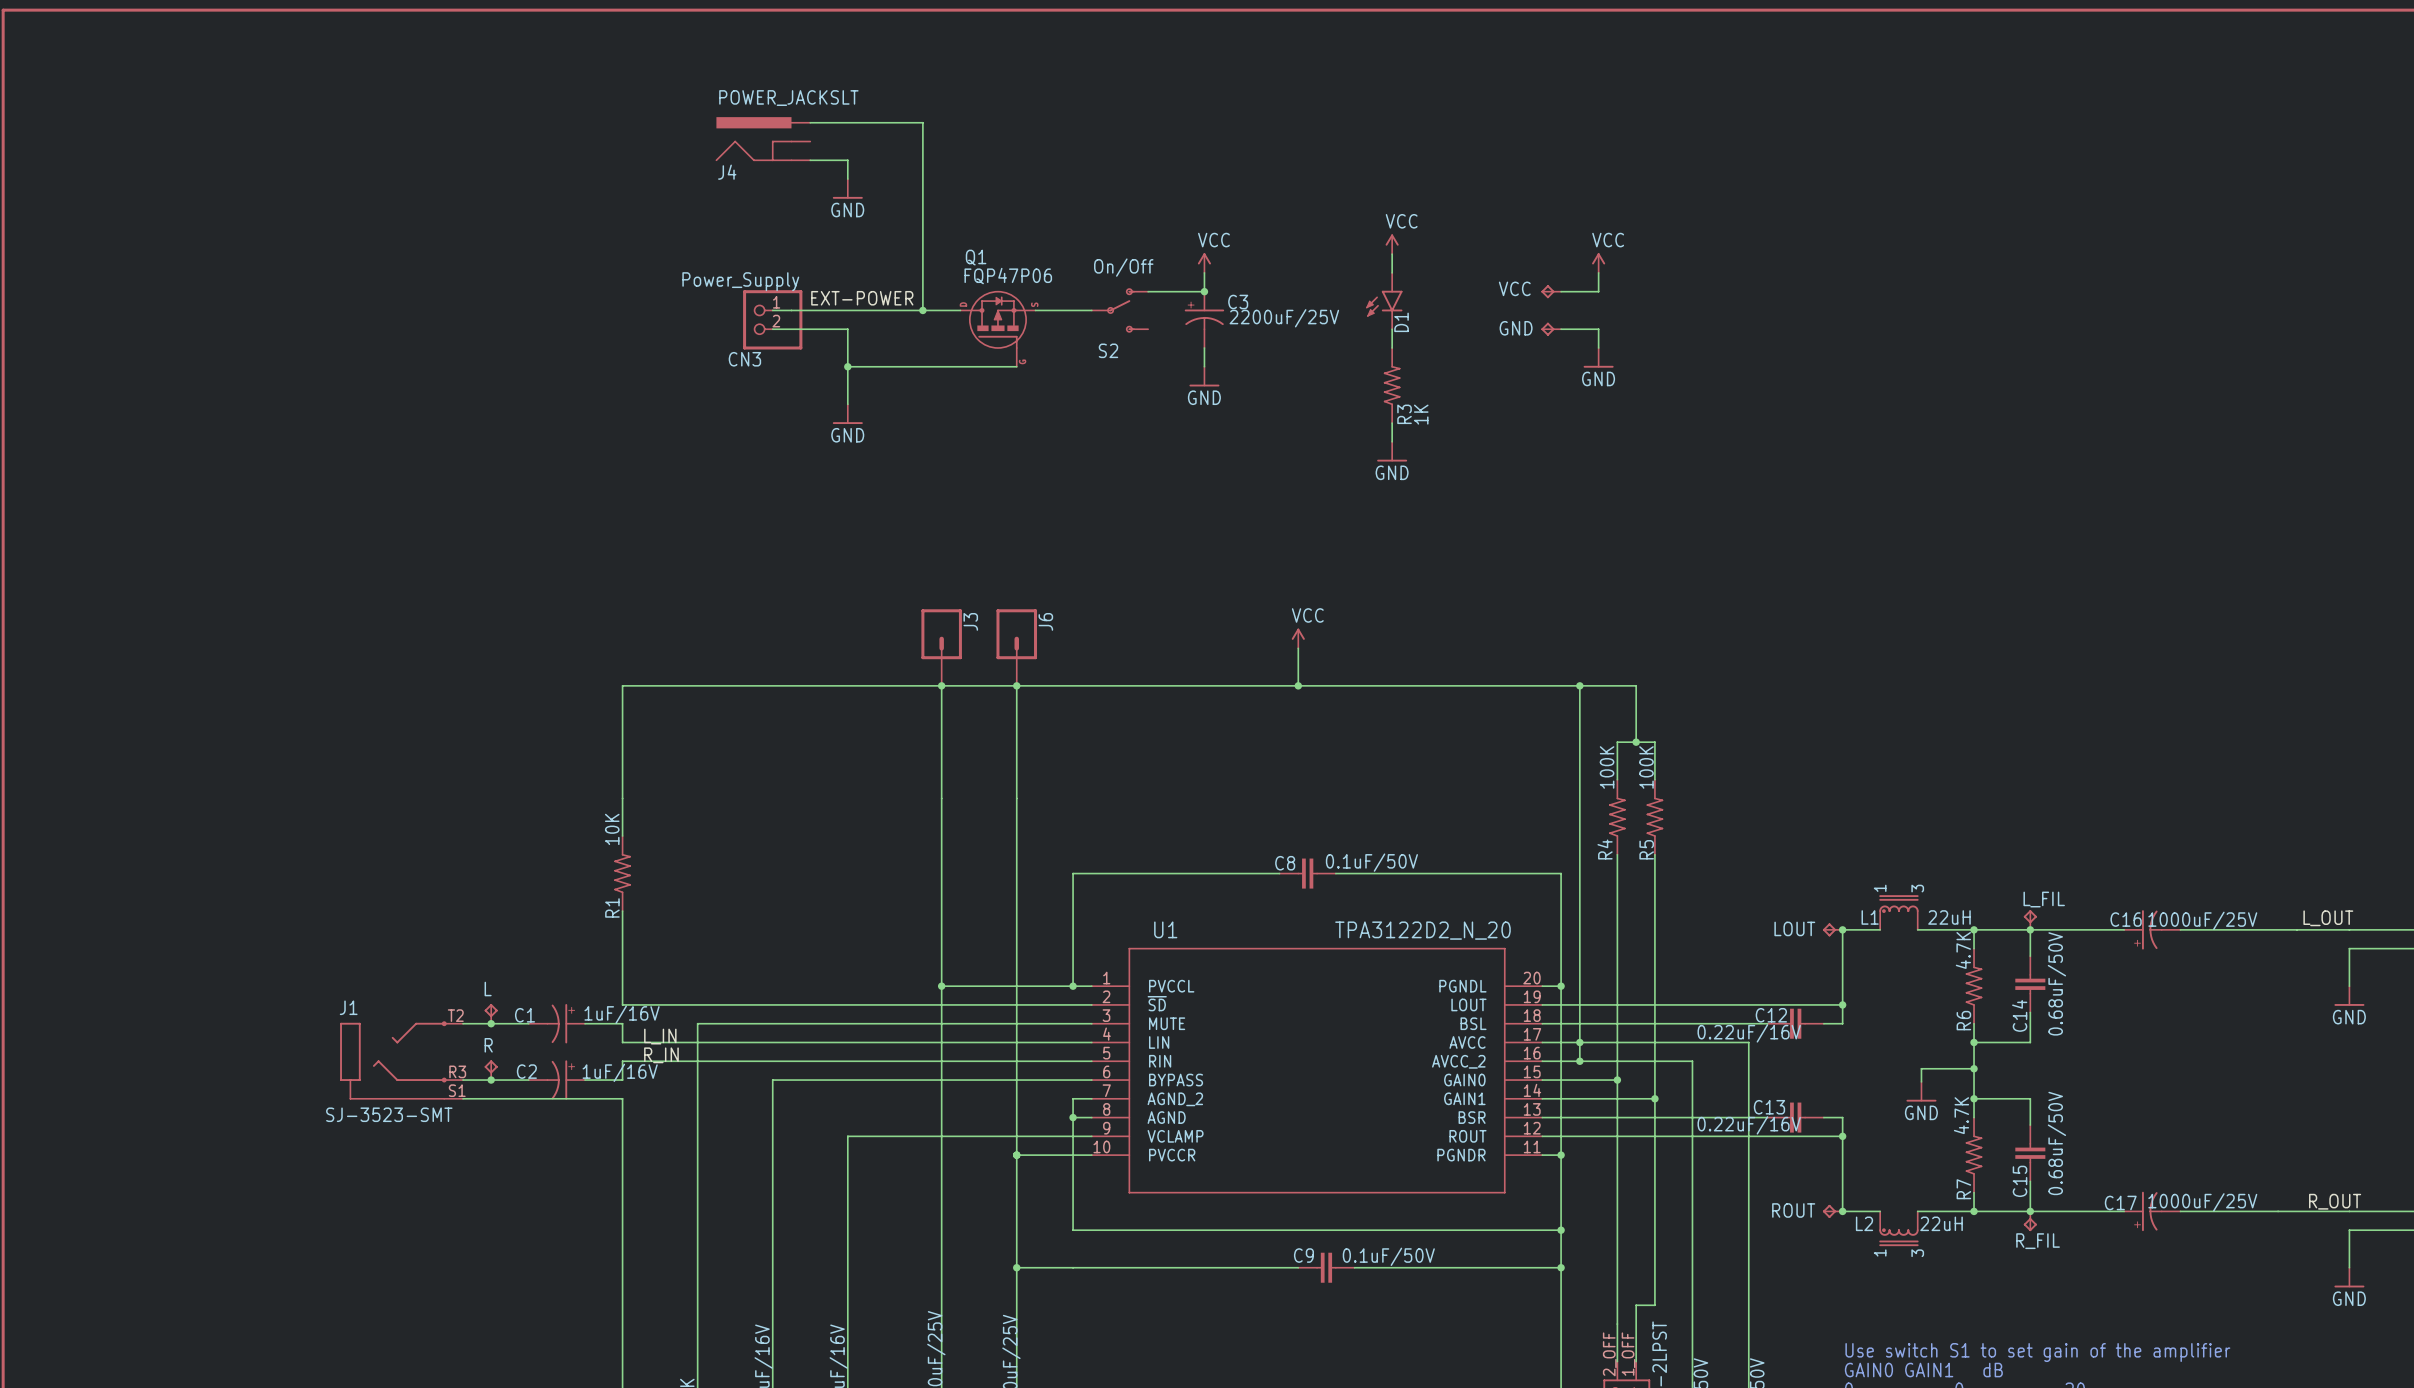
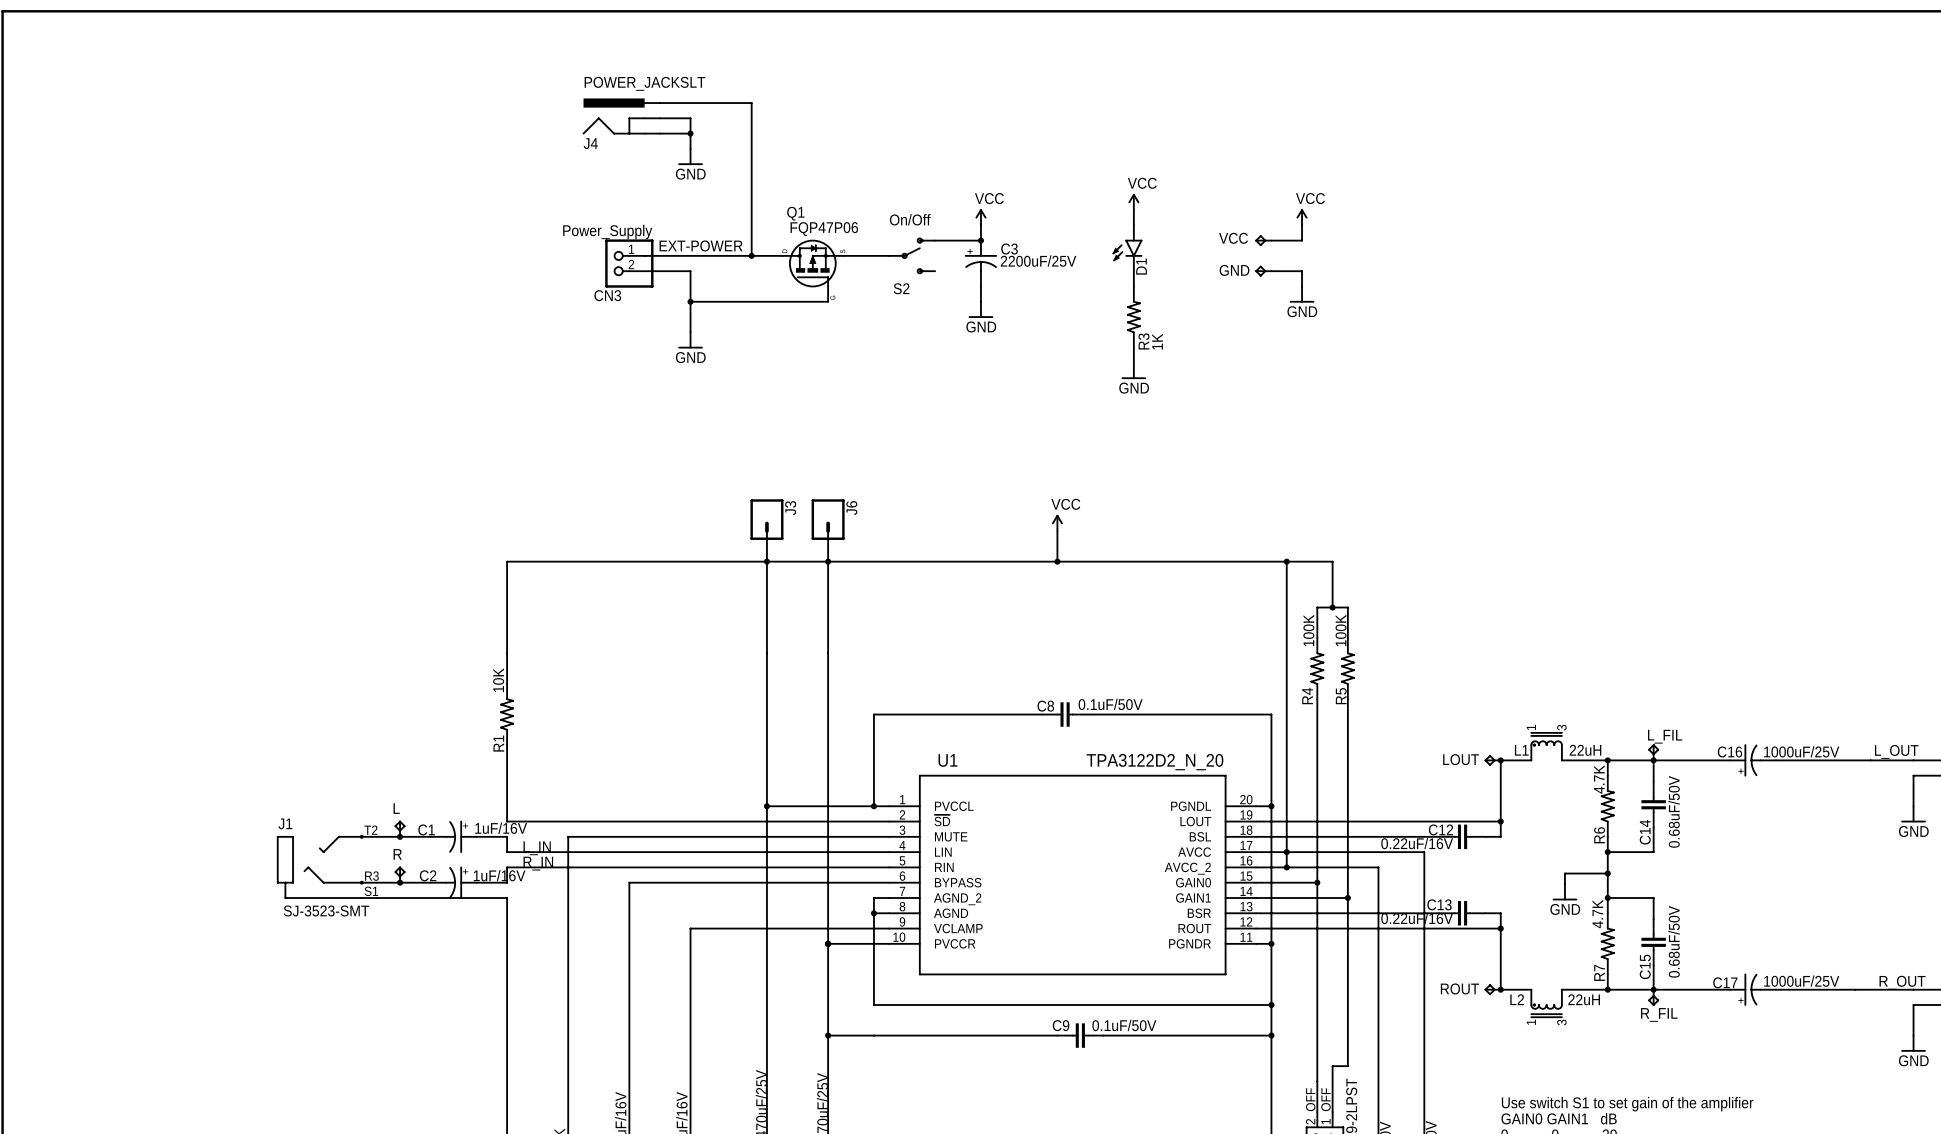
wire: none -> (659, 118) (690, 118) (690, 133)
junction: none -> (690, 133)

